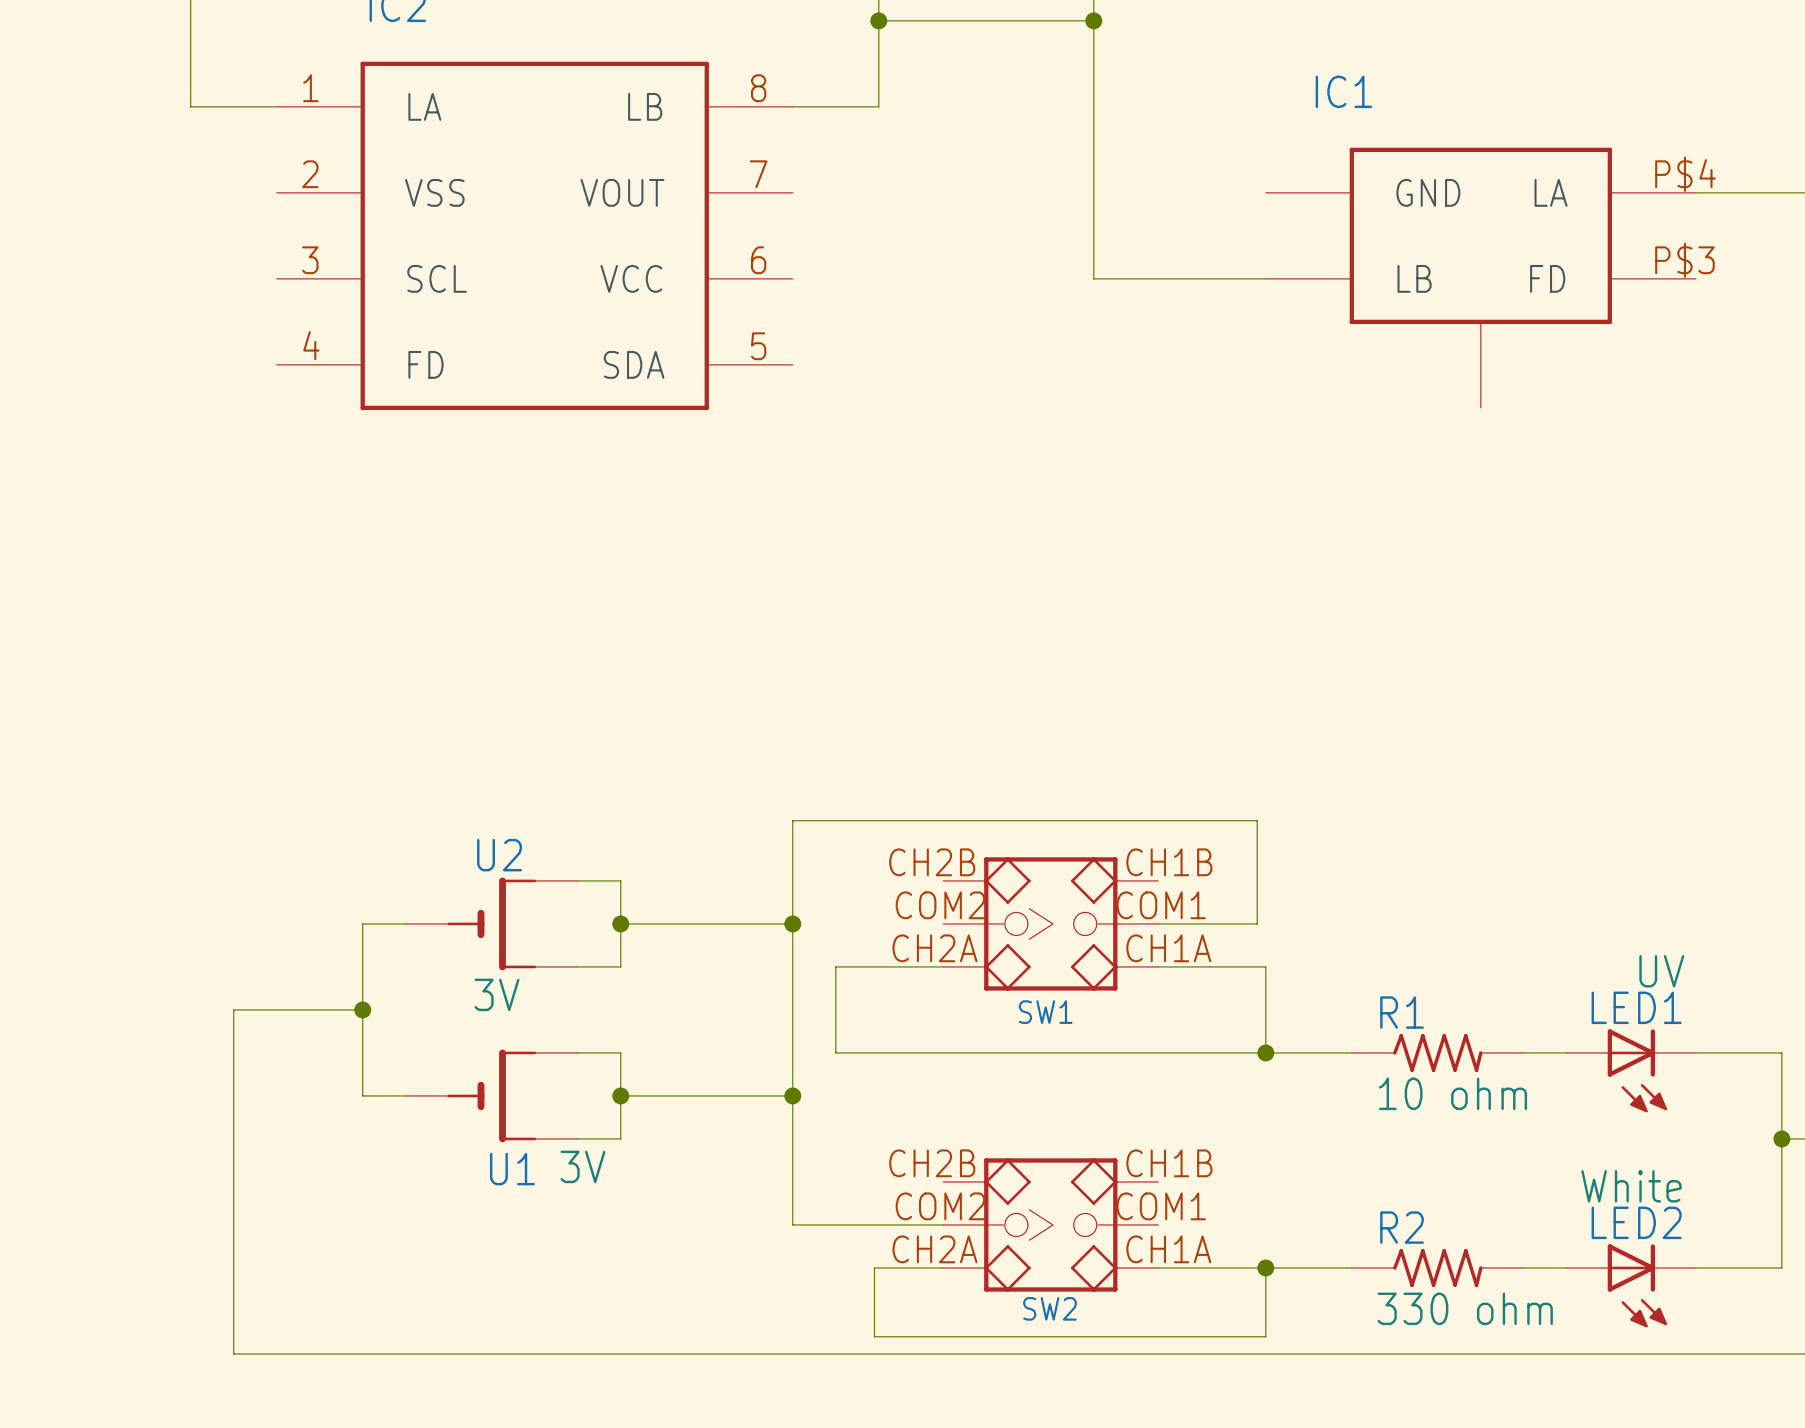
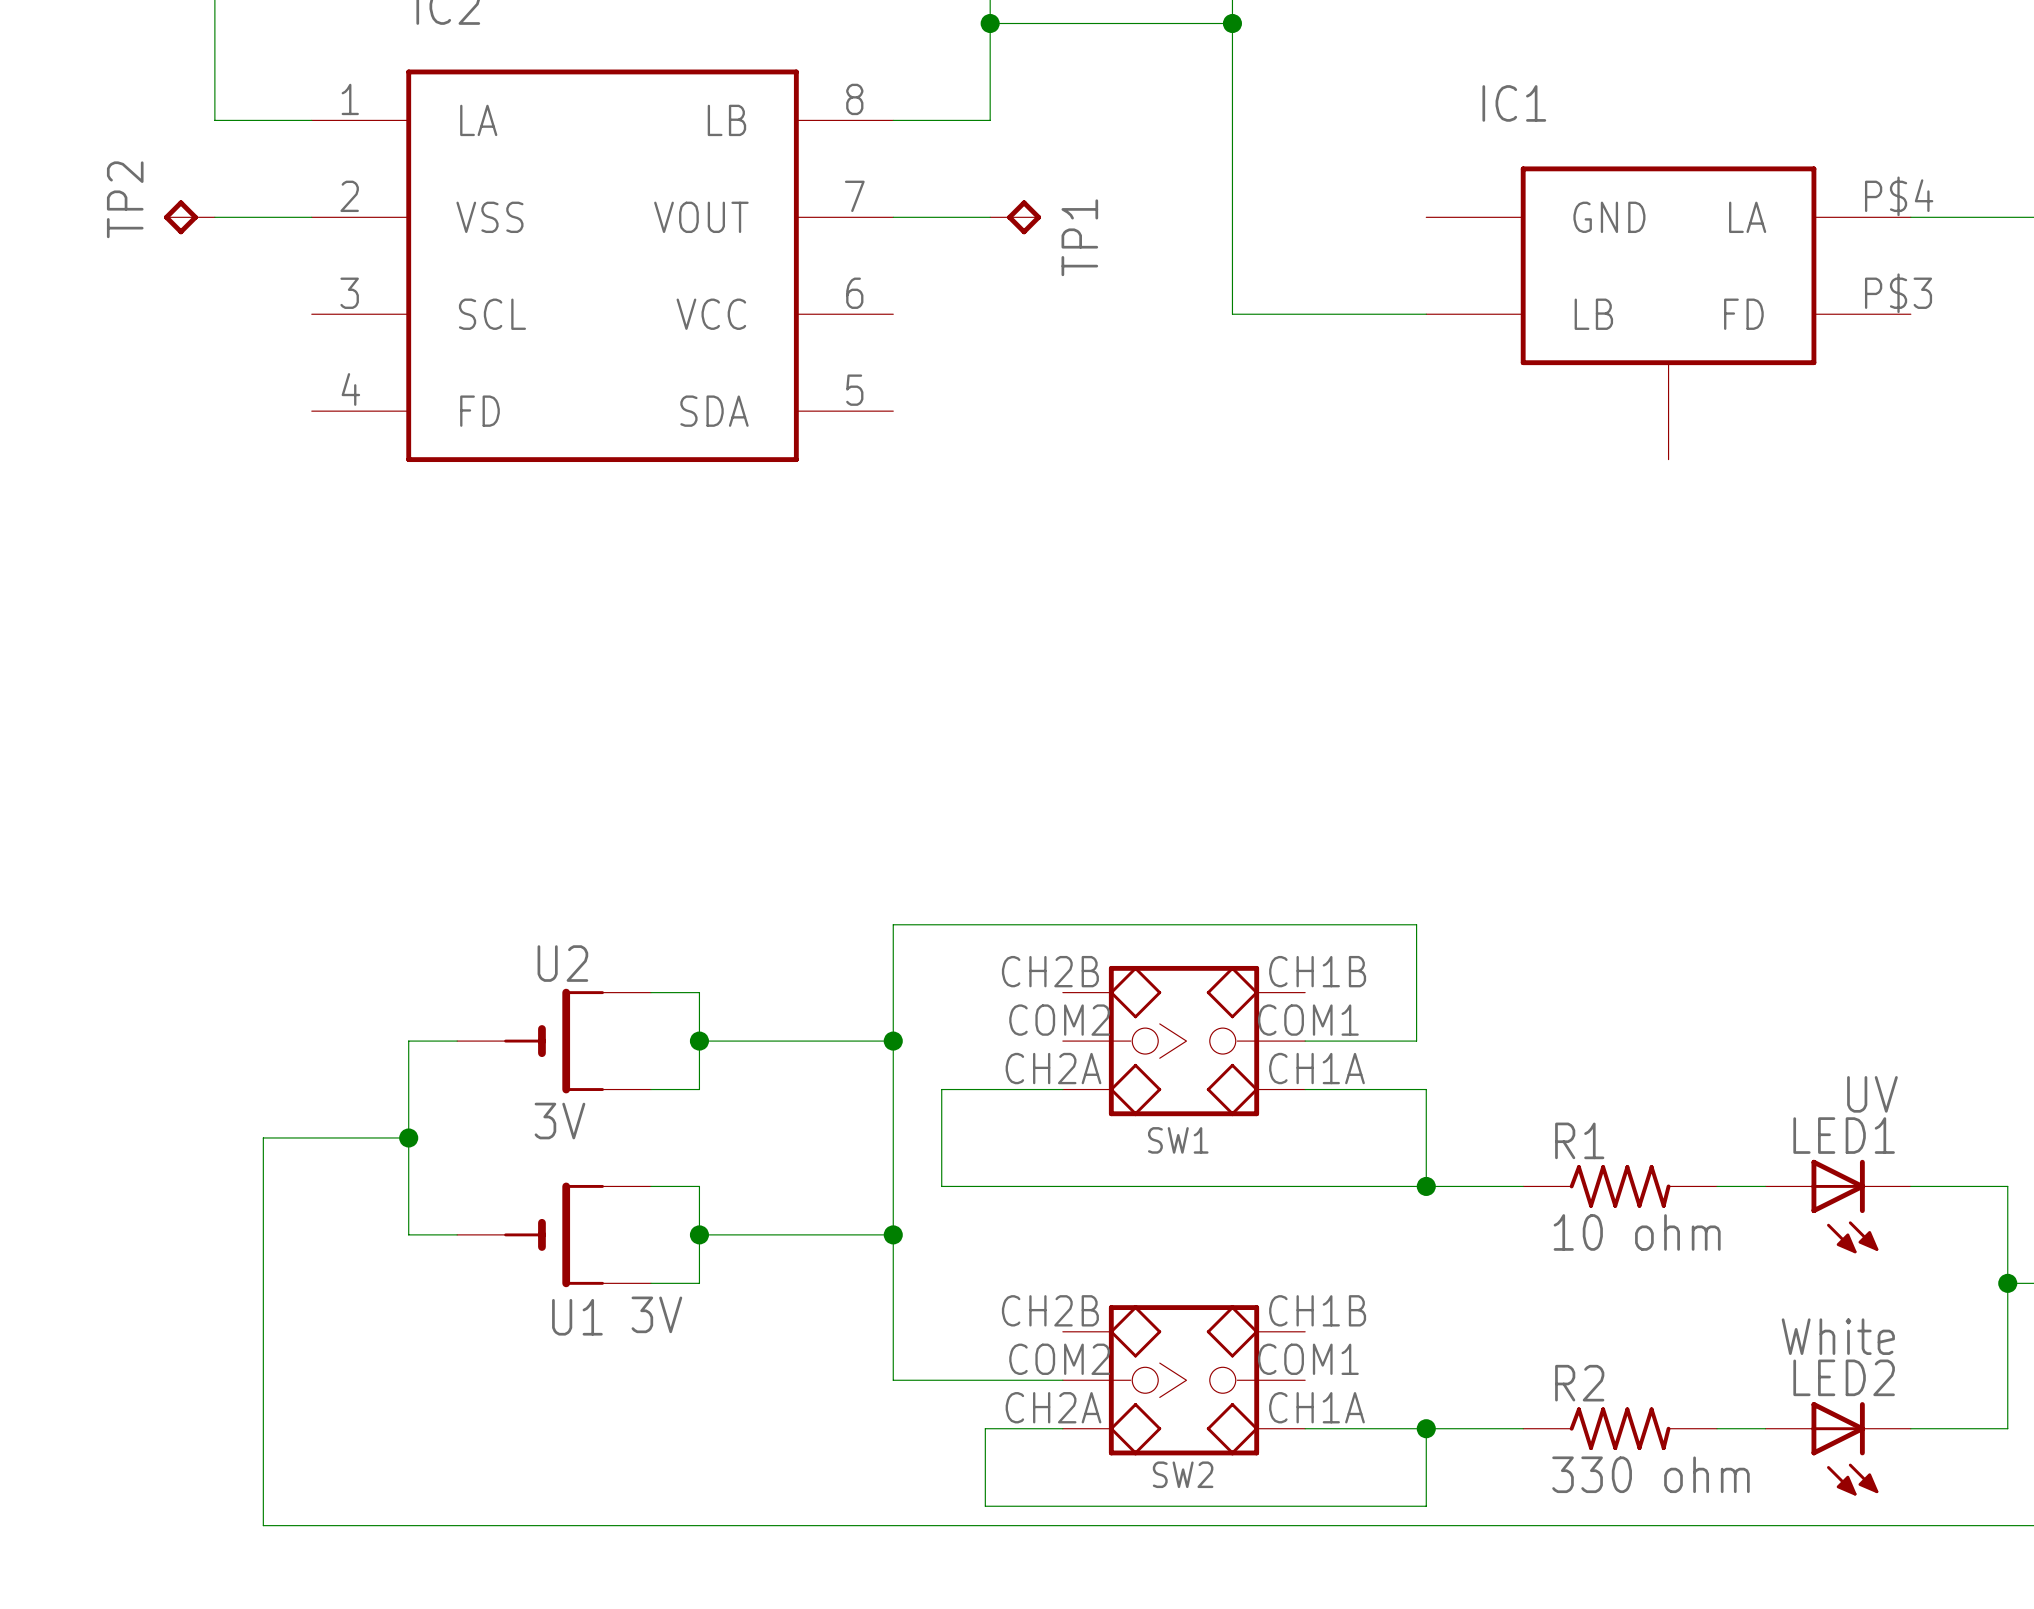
TP2: none -> (189, 217)
wire: none -> (214, 217) (311, 217)
wire: none -> (893, 217) (990, 217)
TP1: none -> (1015, 217)

